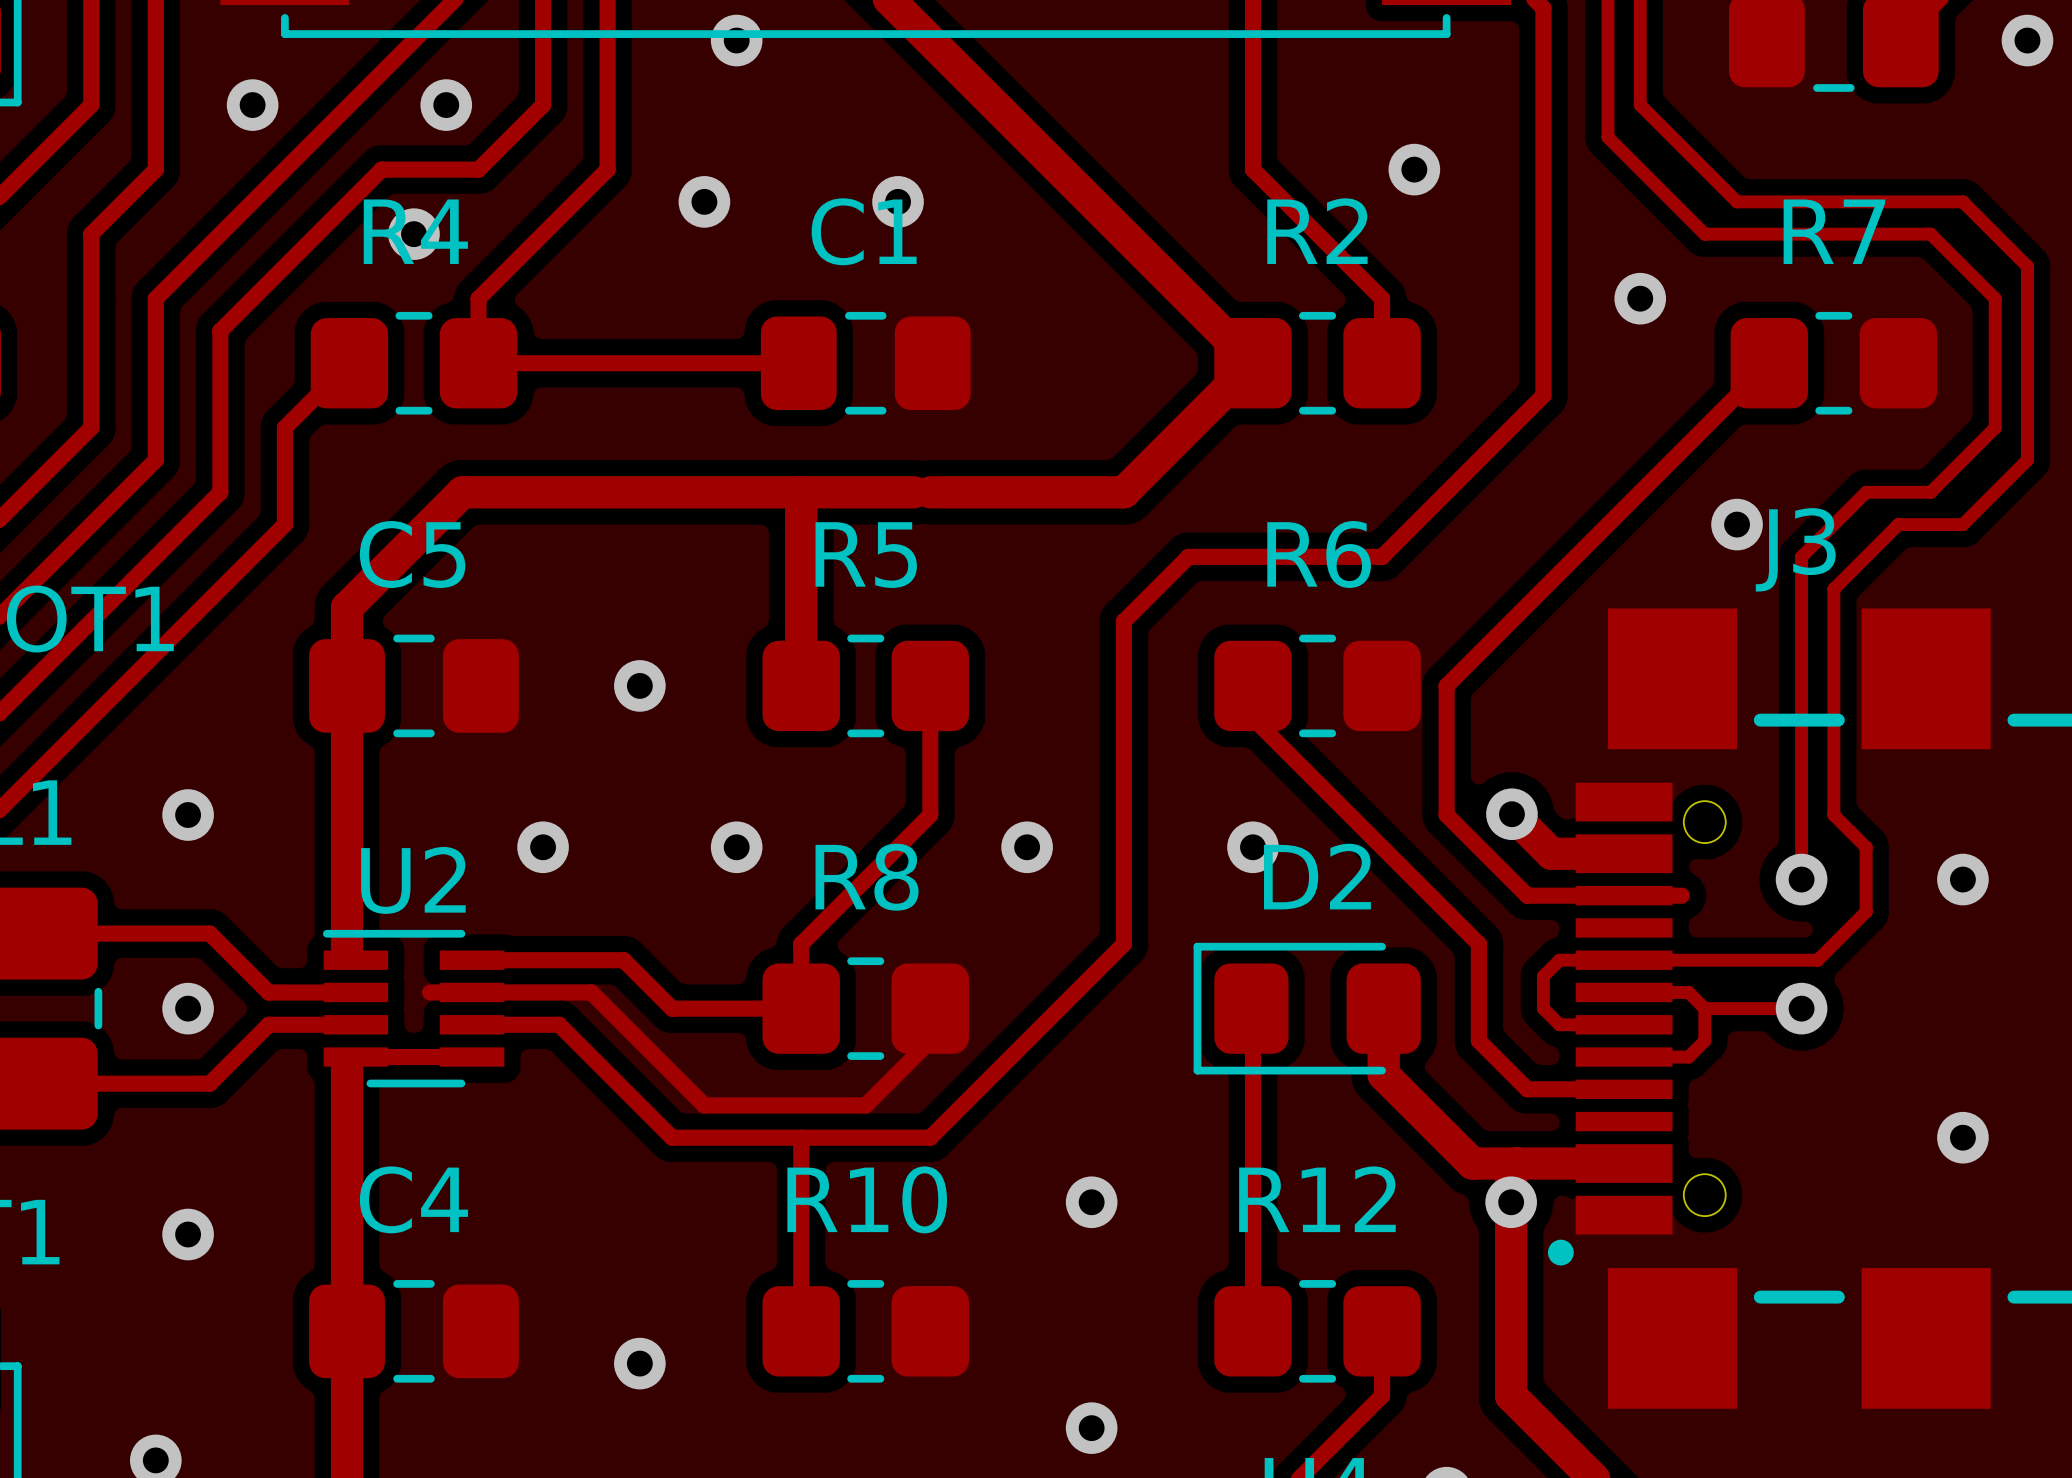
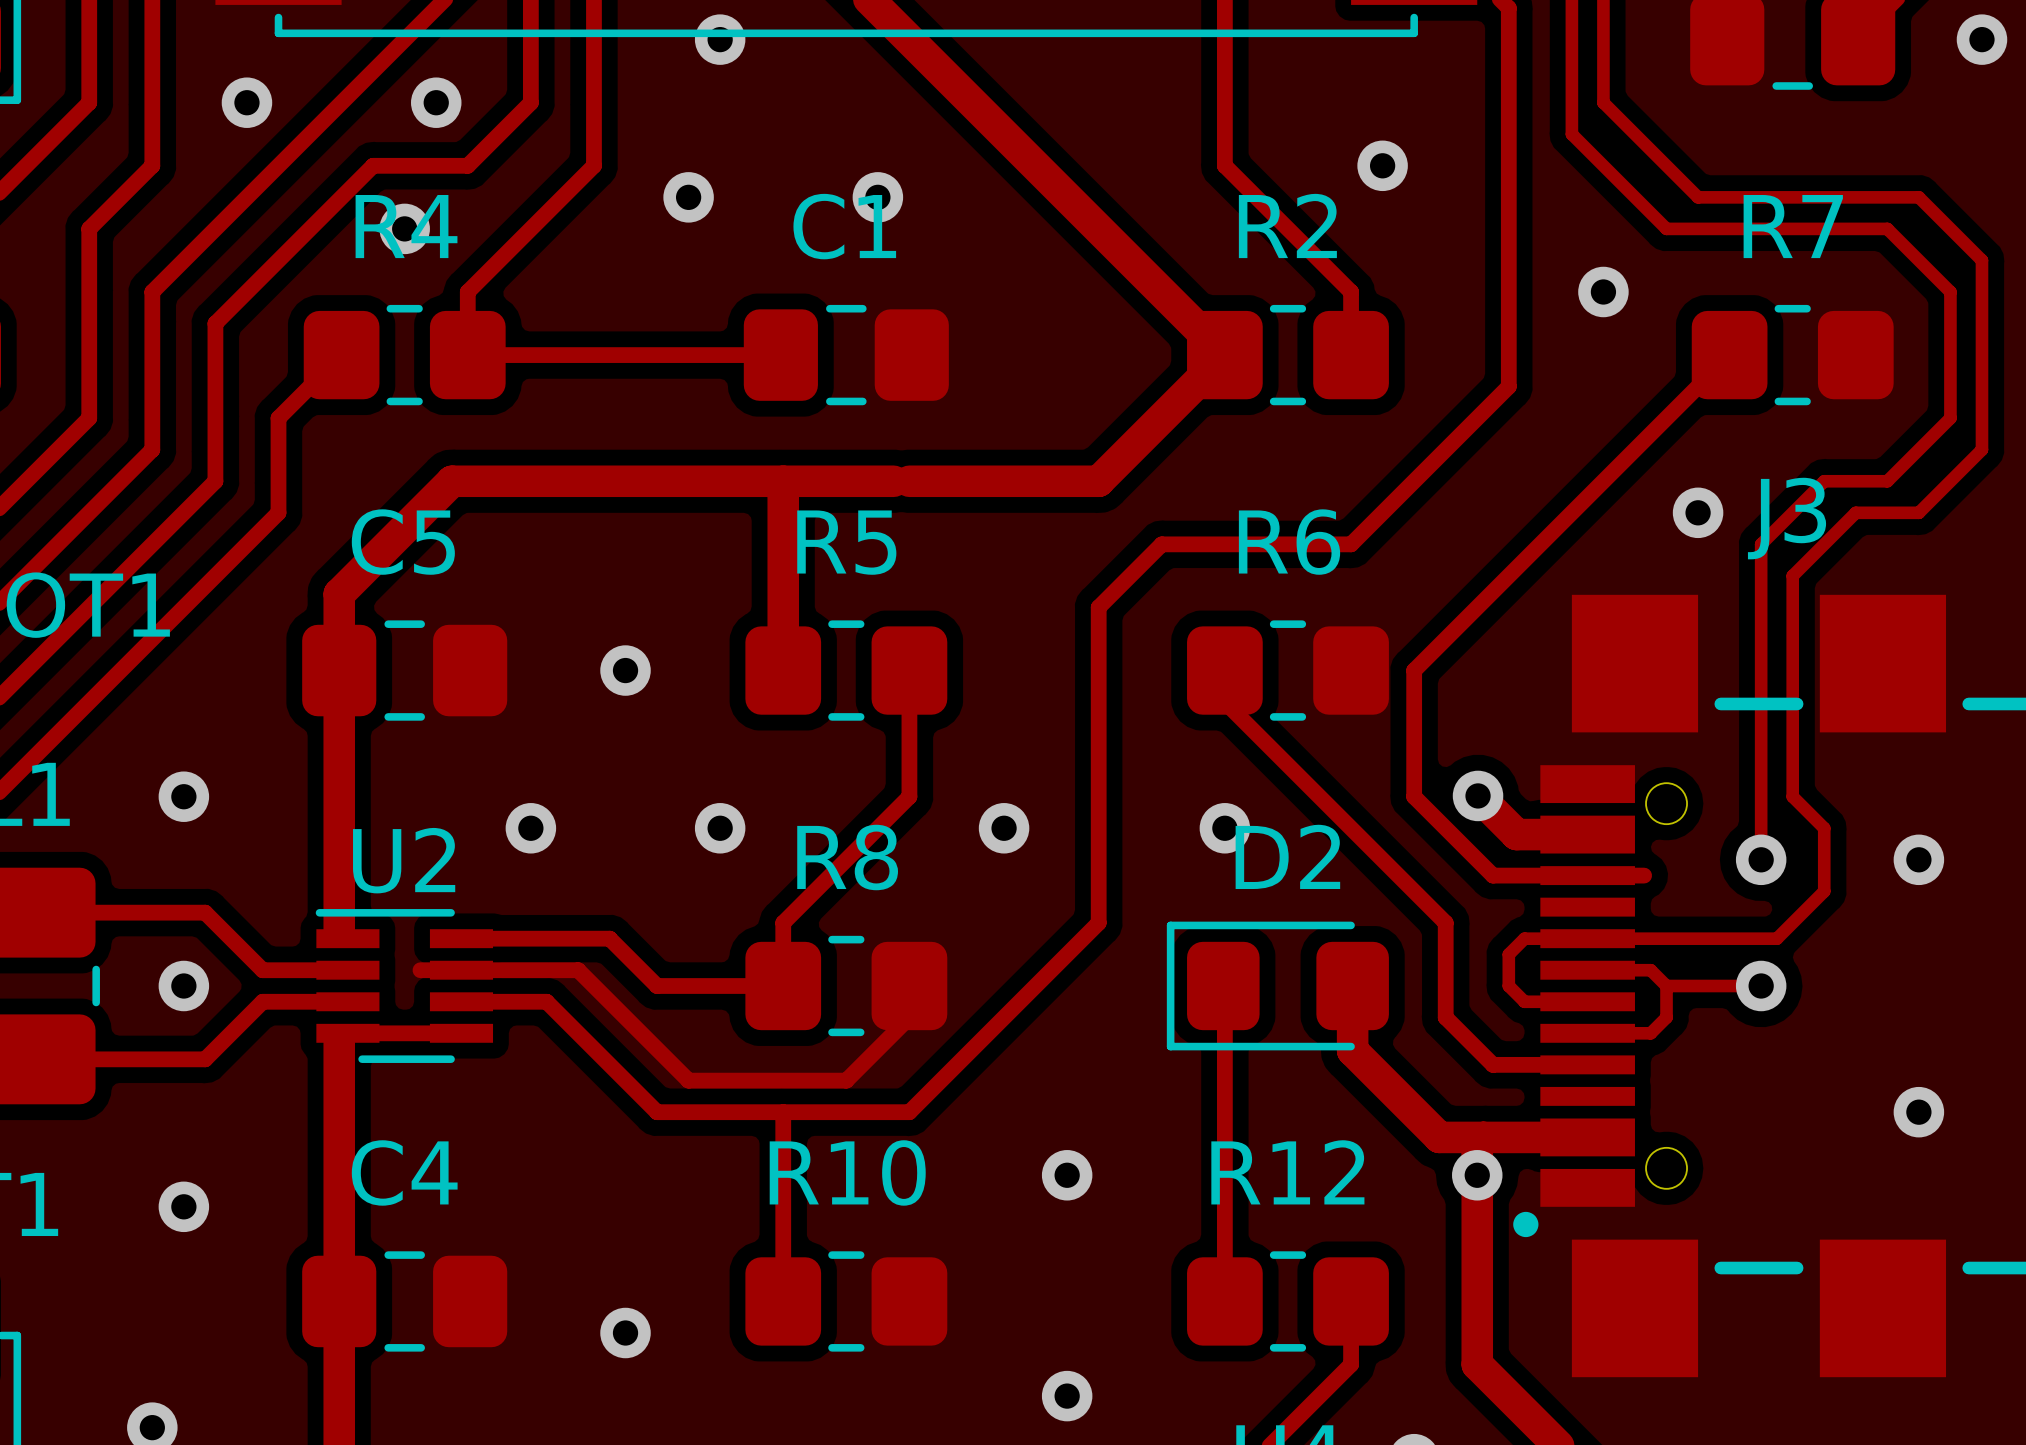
J3 name position: J3 (1795, 549) -> J3 (1787, 518)

